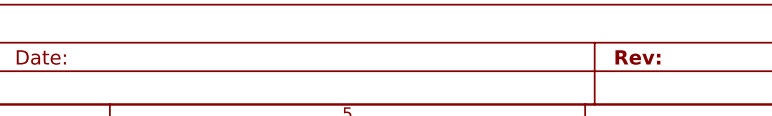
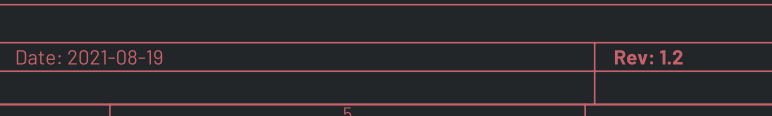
title block: Date: (41, 57) -> Date: 2021-08-19 (89, 57)
title block: Rev: (637, 57) -> Rev: 1.2 (648, 57)

